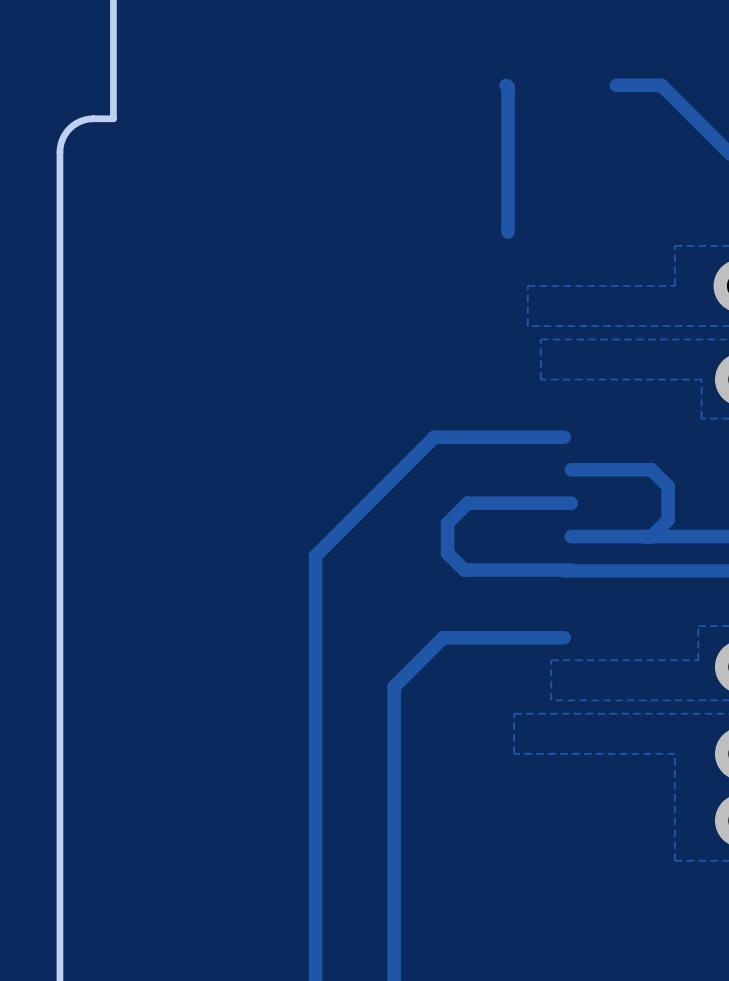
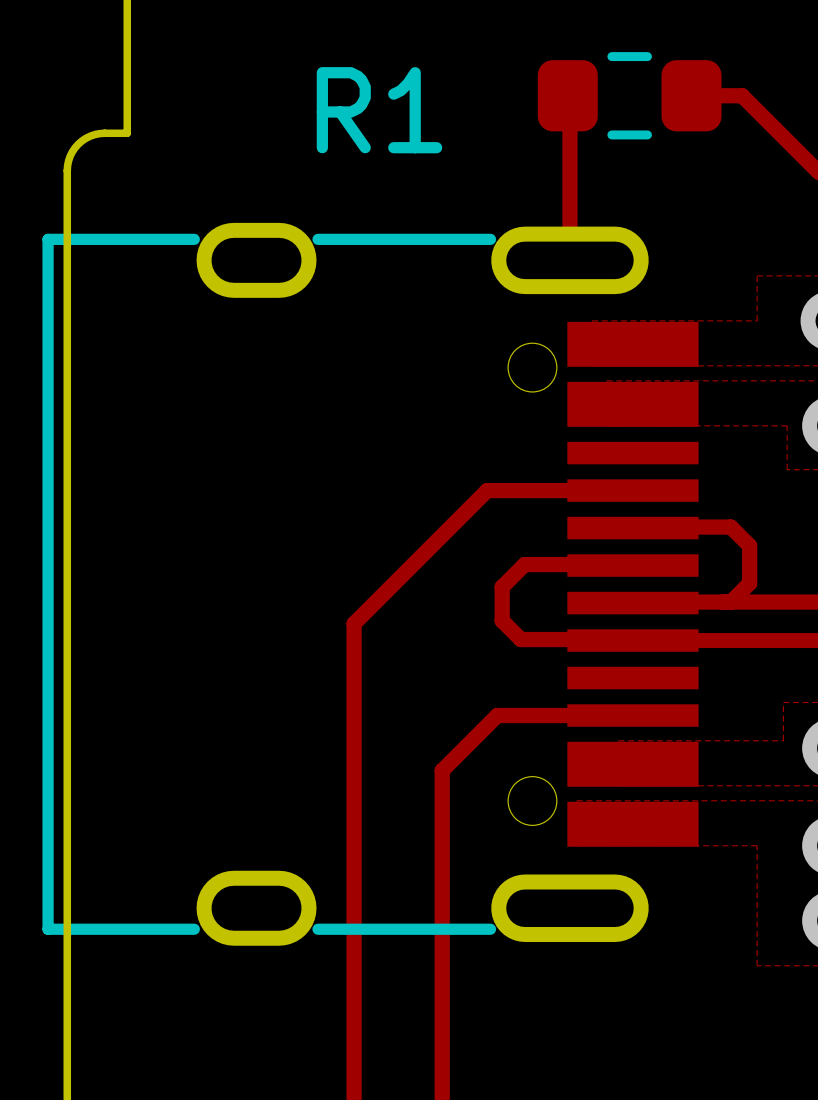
R1: none -> (629, 95)
part: none -> (370, 584)

